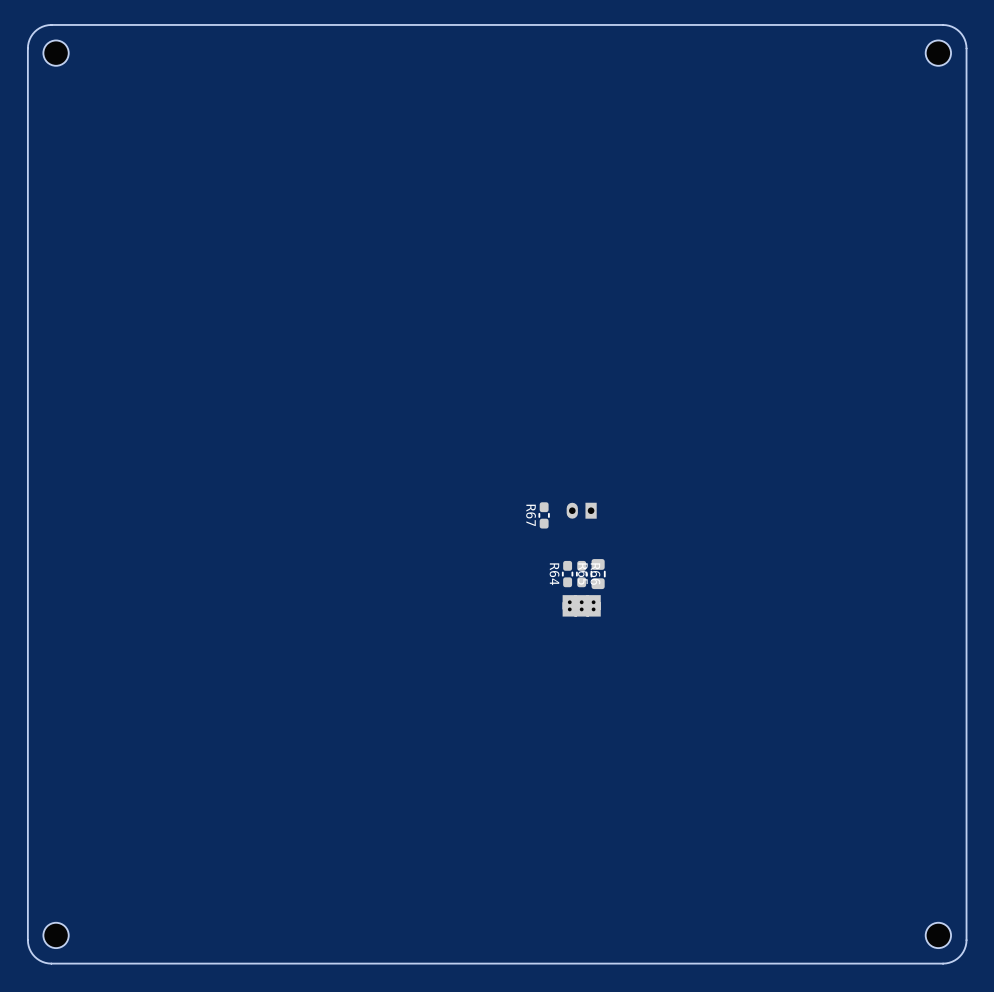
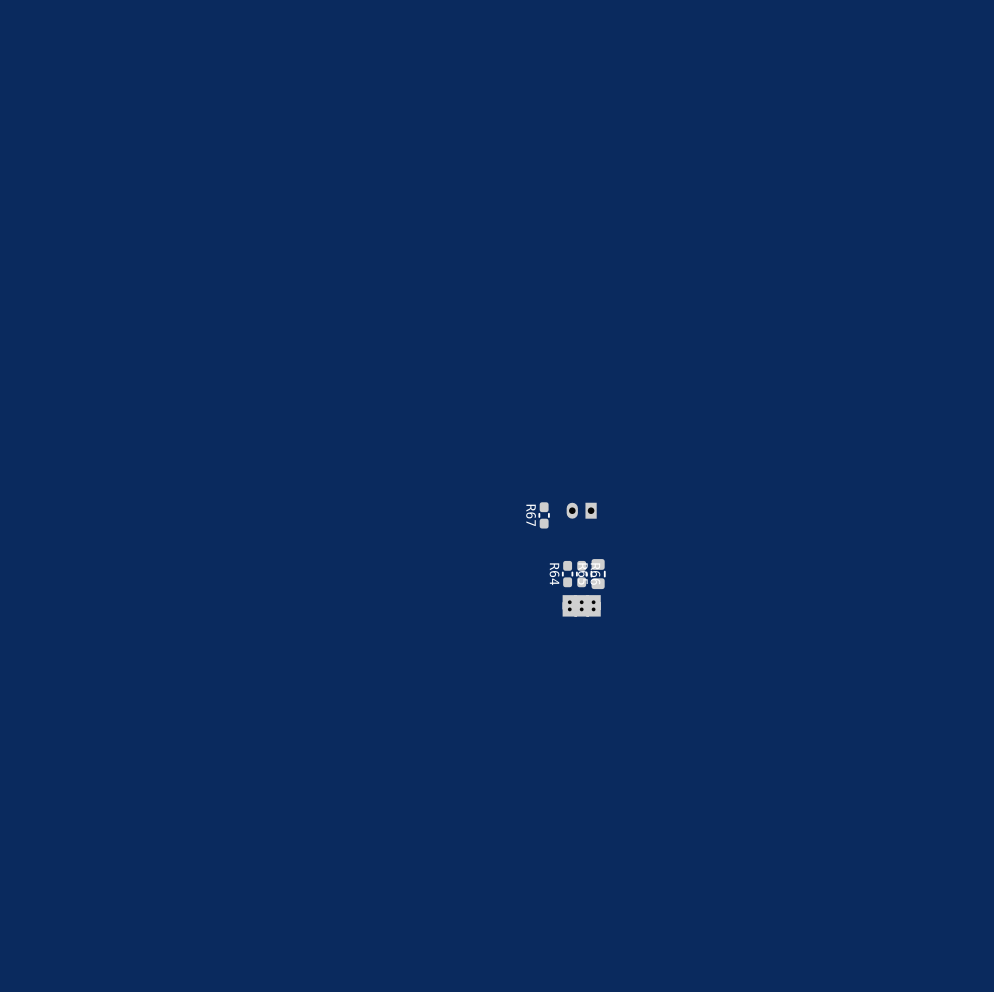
board edge: (943, 24) (51, 24) (42, 26) (34, 31) (29, 39) (27, 48) (27, 940) (29, 949) (34, 956) (42, 961) (51, 963) (943, 963) (952, 961) (959, 956) (964, 949) (966, 940) (966, 48) (964, 39) (959, 31) (952, 26) (943, 24) -> none
part: (56, 53) -> none
part: (938, 53) -> none
part: (56, 935) -> none
part: (938, 935) -> none

